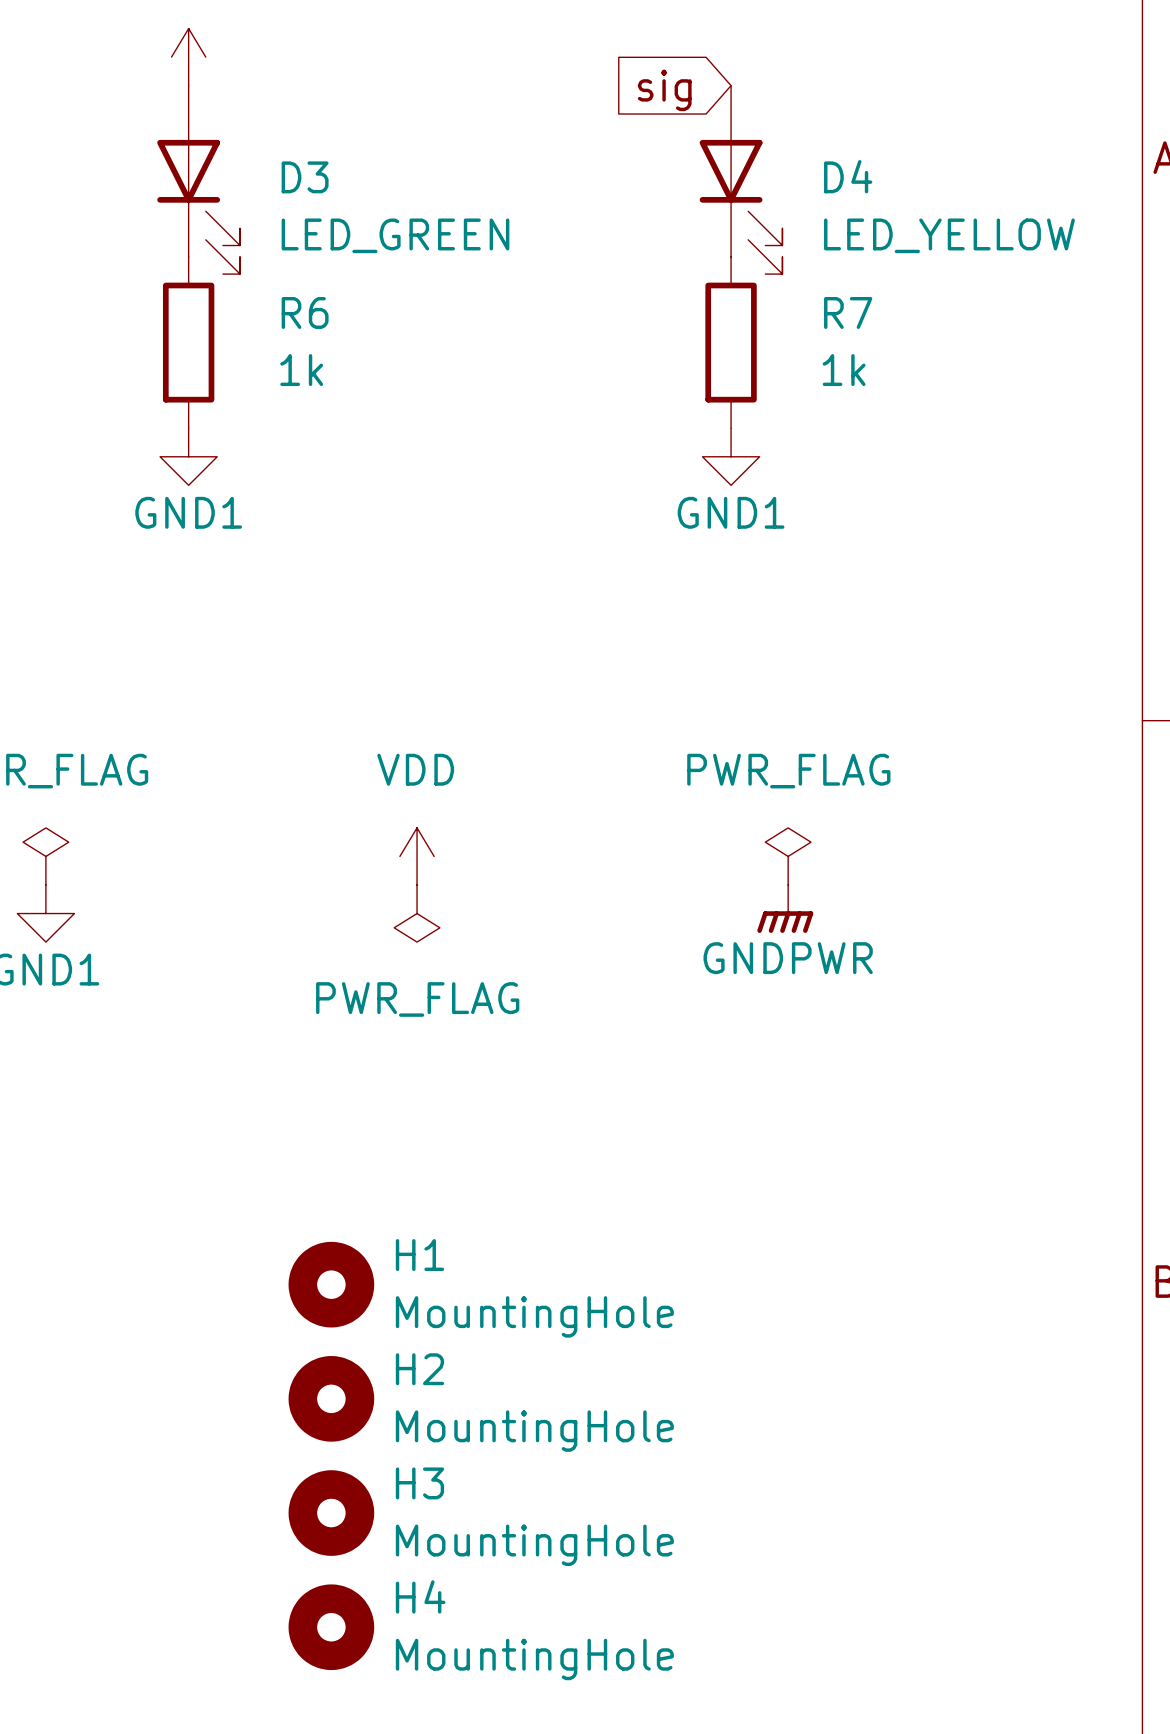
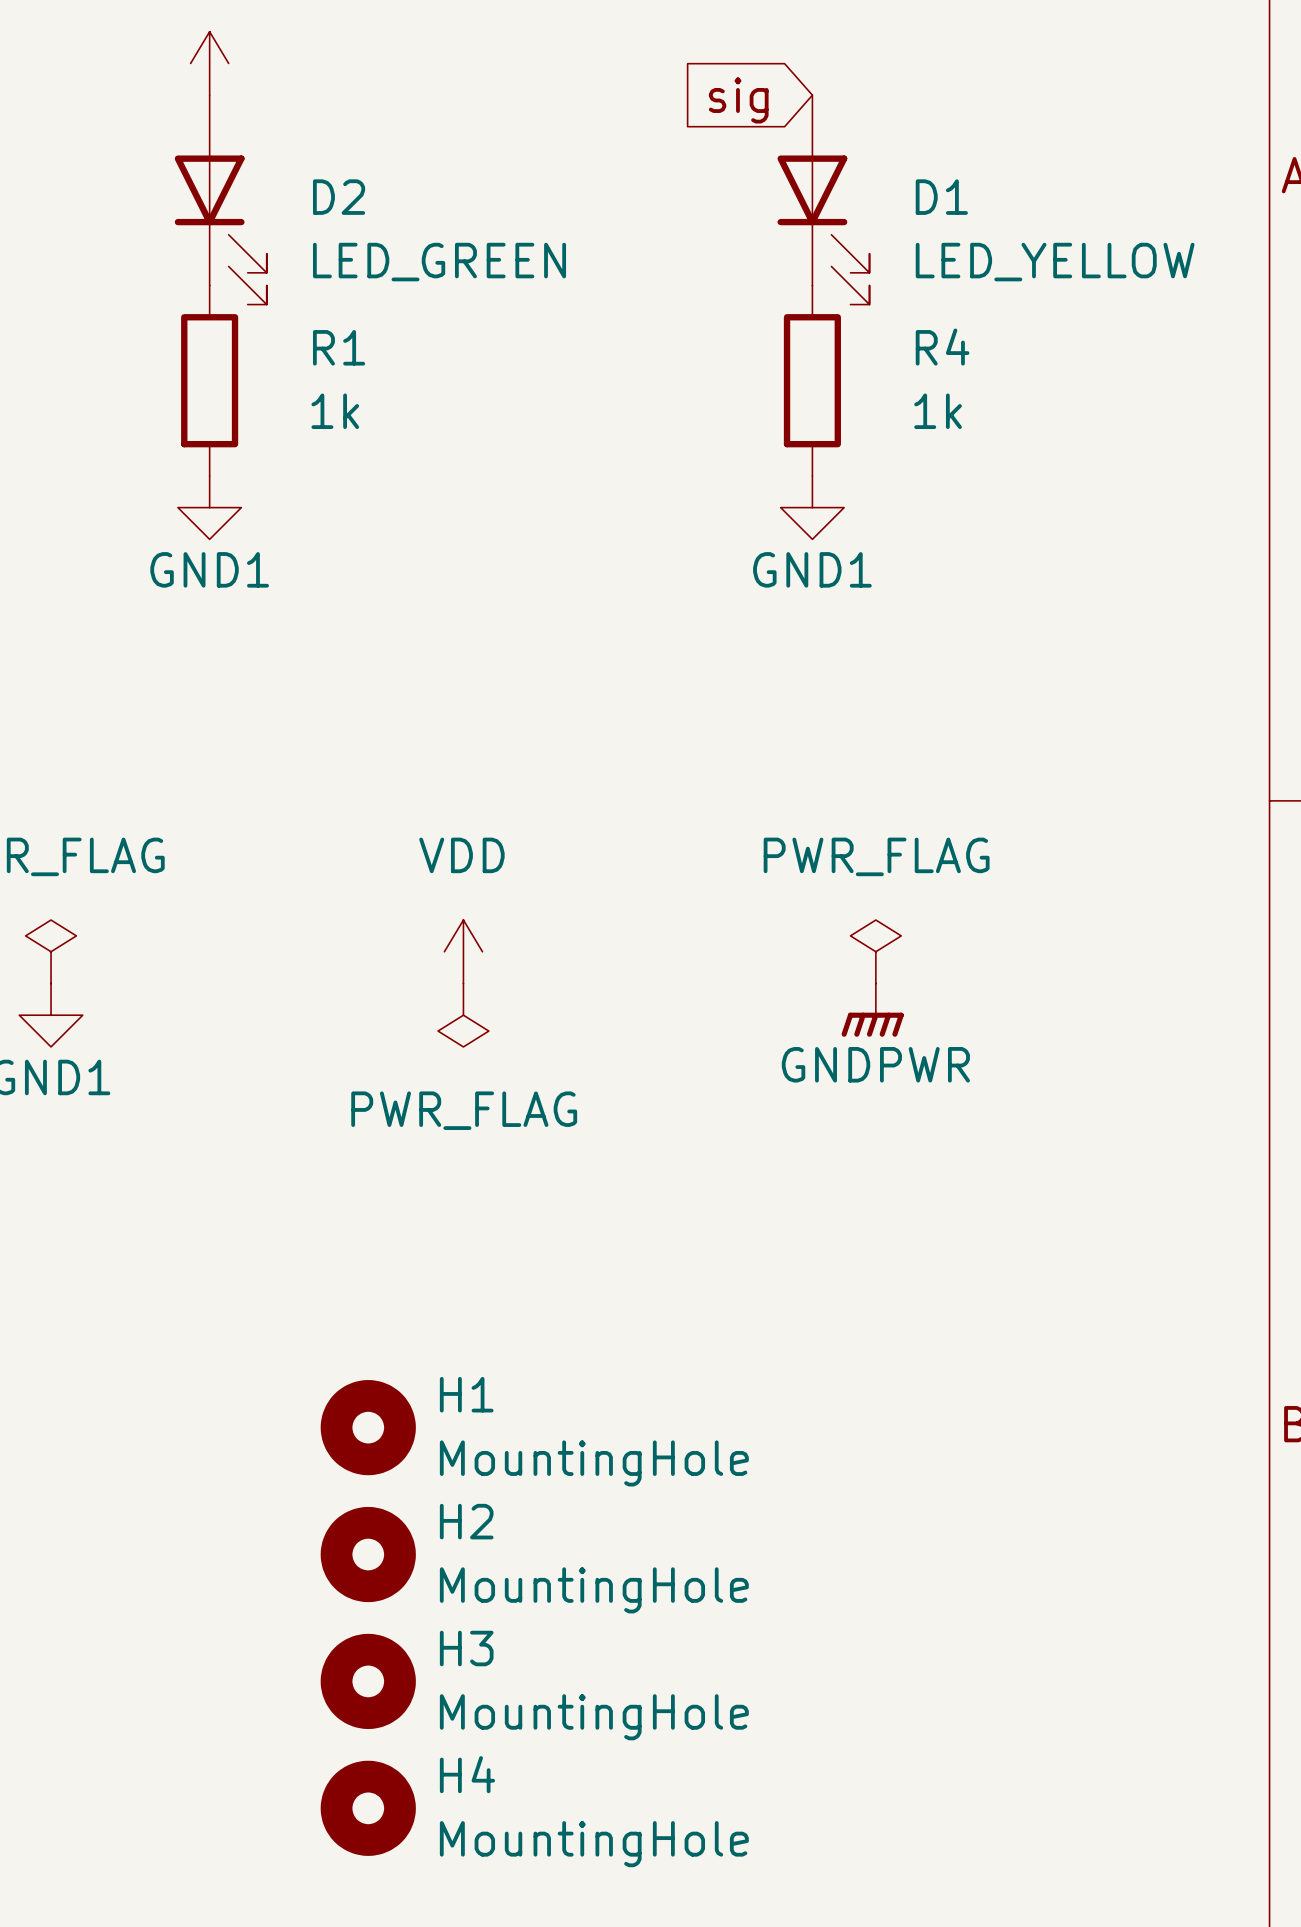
D4 name: D4 (848, 176) -> D1 (941, 197)
D3 name: D3 (305, 177) -> D2 (339, 197)
R6 name: R6 (305, 312) -> R1 (339, 347)
R7 name: R7 (848, 312) -> R4 (942, 347)

